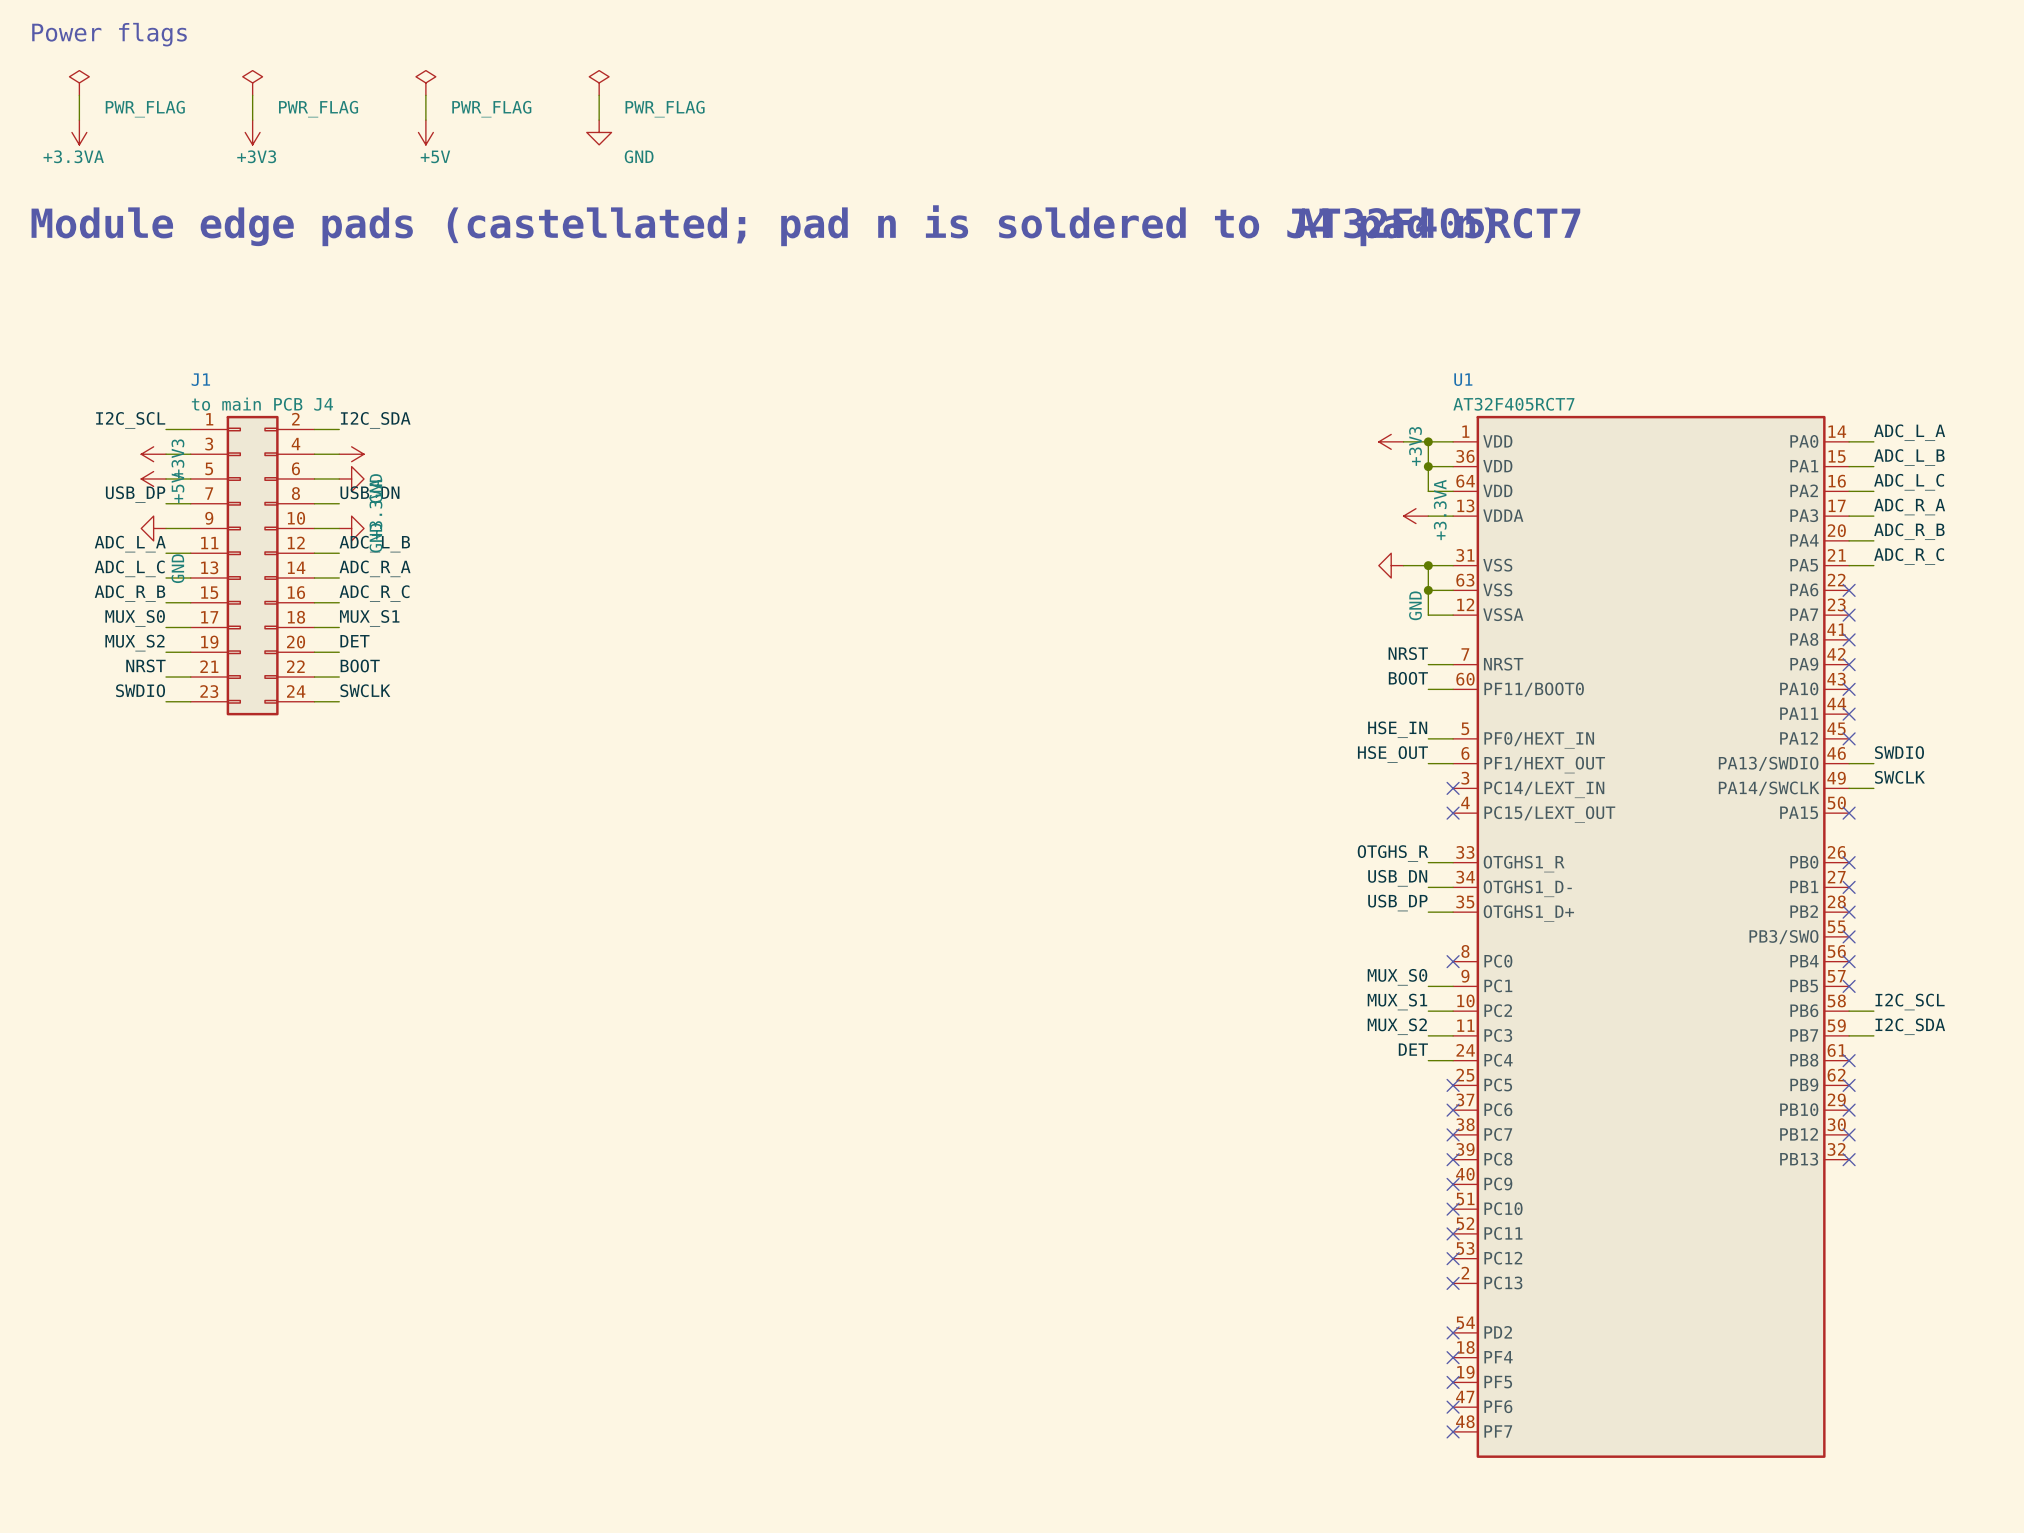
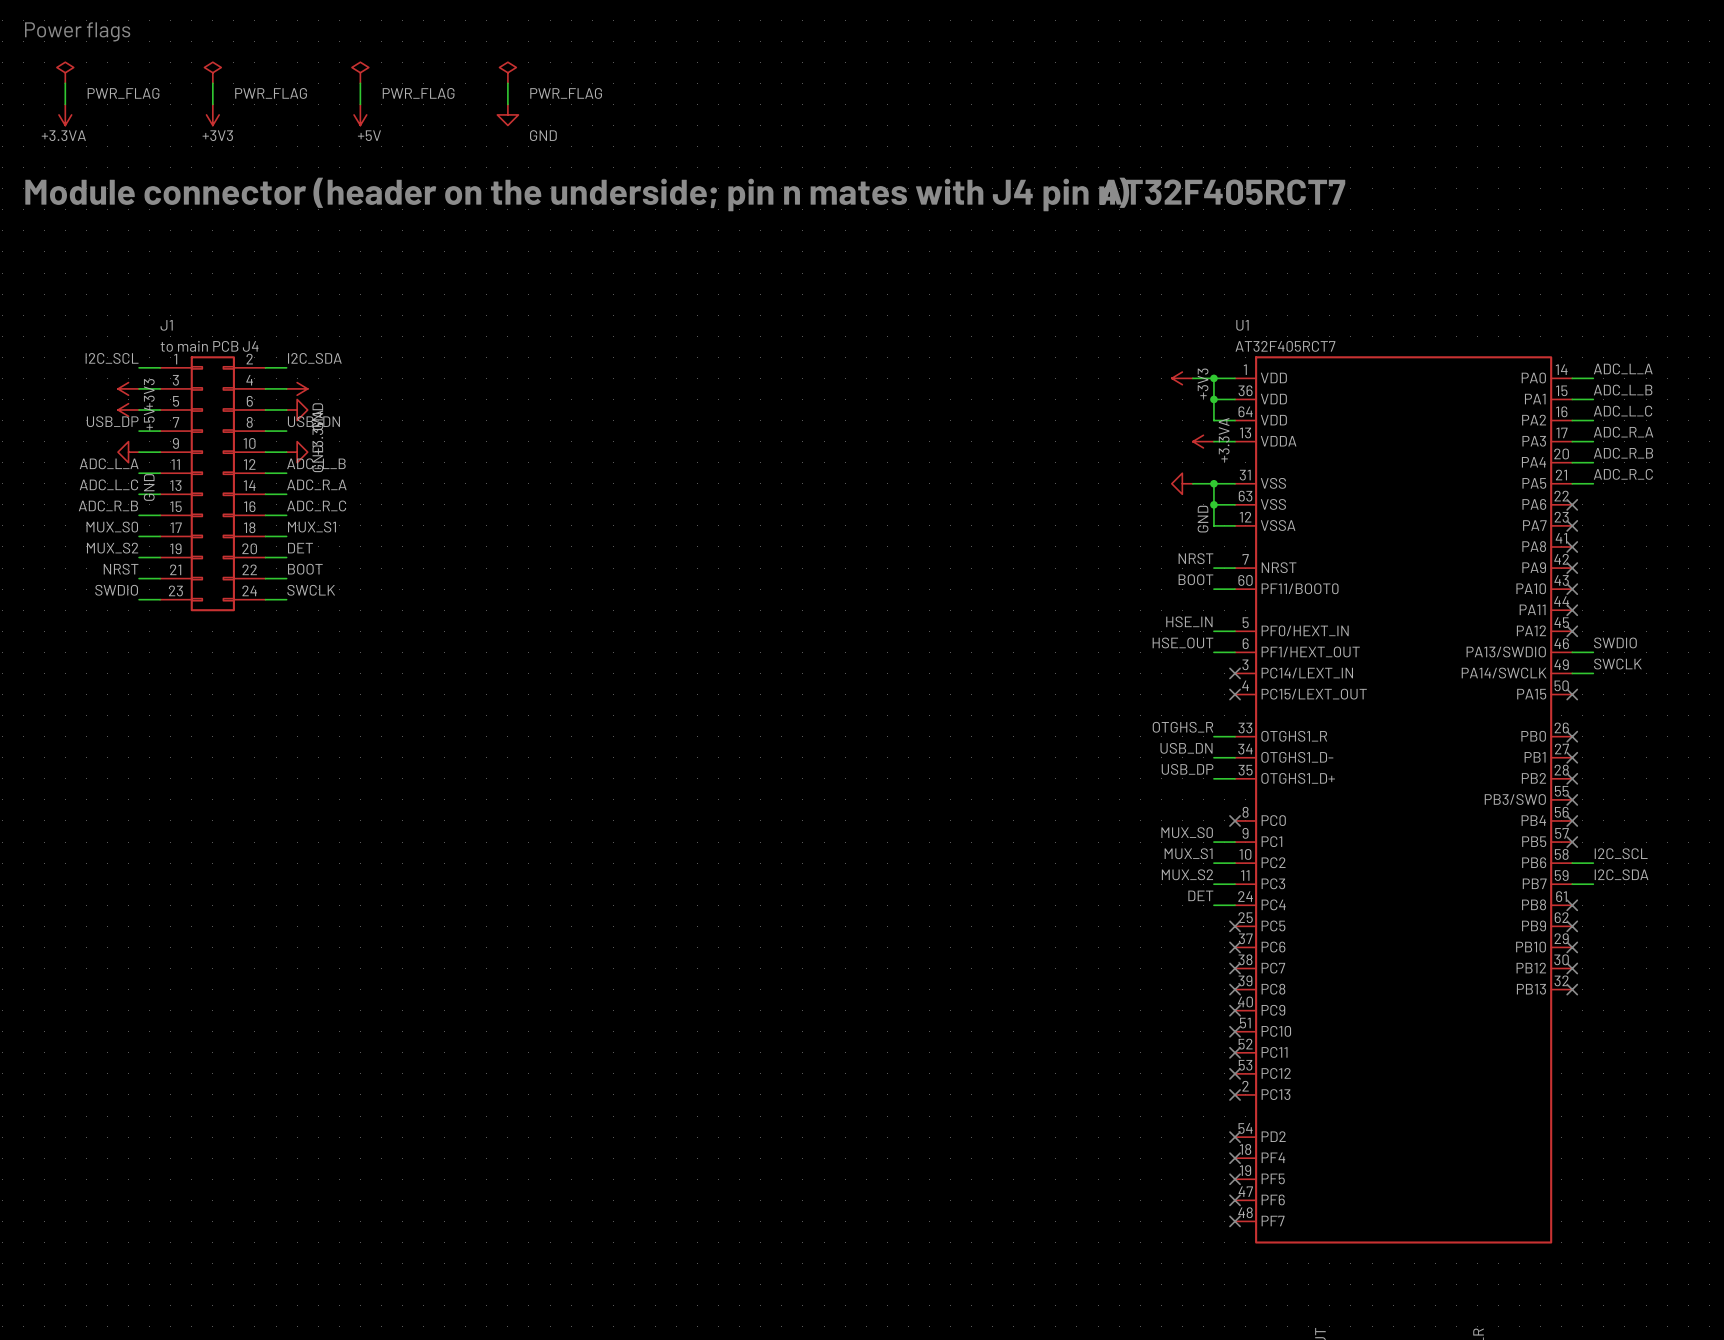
text: Module edge pads (castellated; pad n is soldered to J4 pad n) (763, 225) -> Module connector (header on the underside; pin n mates with J4 pin n) (577, 194)

